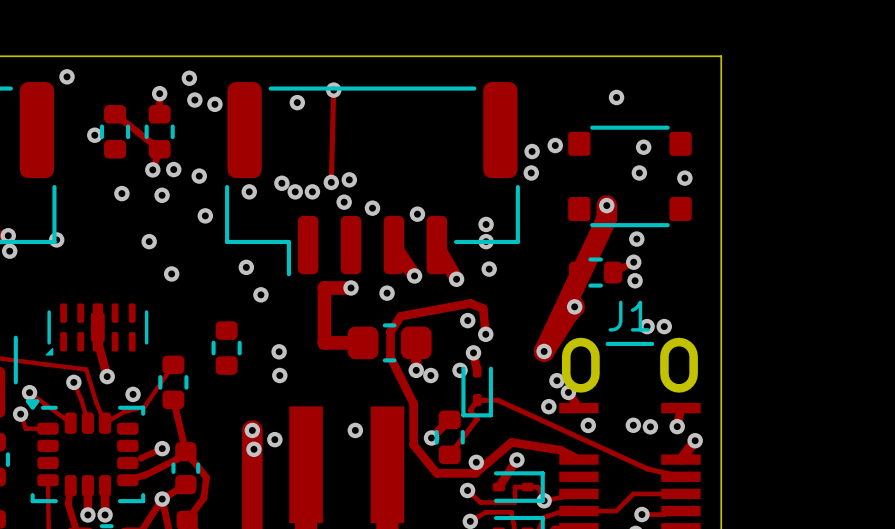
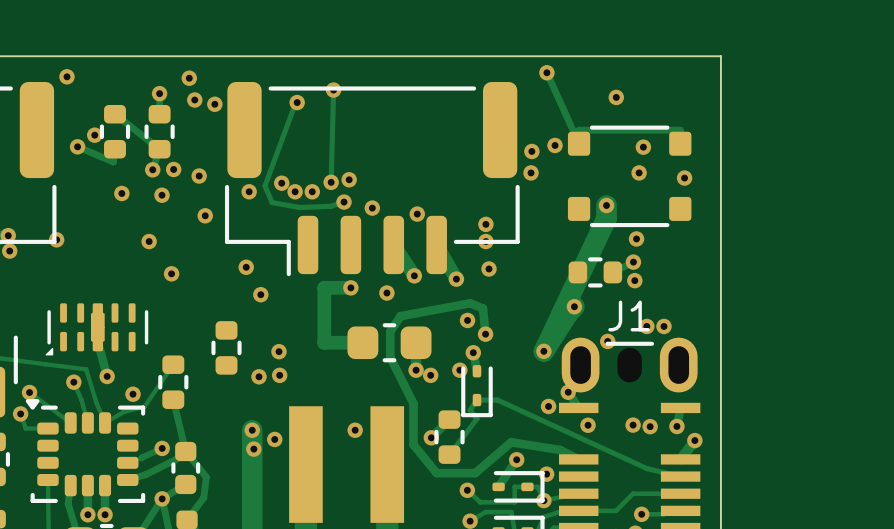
track: none -> (546, 72) (579, 143) (579, 130) (680, 130) (680, 143)
via: none -> (546, 72)
track: none -> (296, 101) (265, 185) (272, 202) (299, 207) (330, 206) (344, 202)
track: none -> (77, 146) (113, 162) (114, 149)
via: none -> (77, 146)
via: none -> (607, 341)
via: none -> (259, 376)
via: (556, 380) -> none
via: (476, 462) -> none
via: none -> (546, 474)

